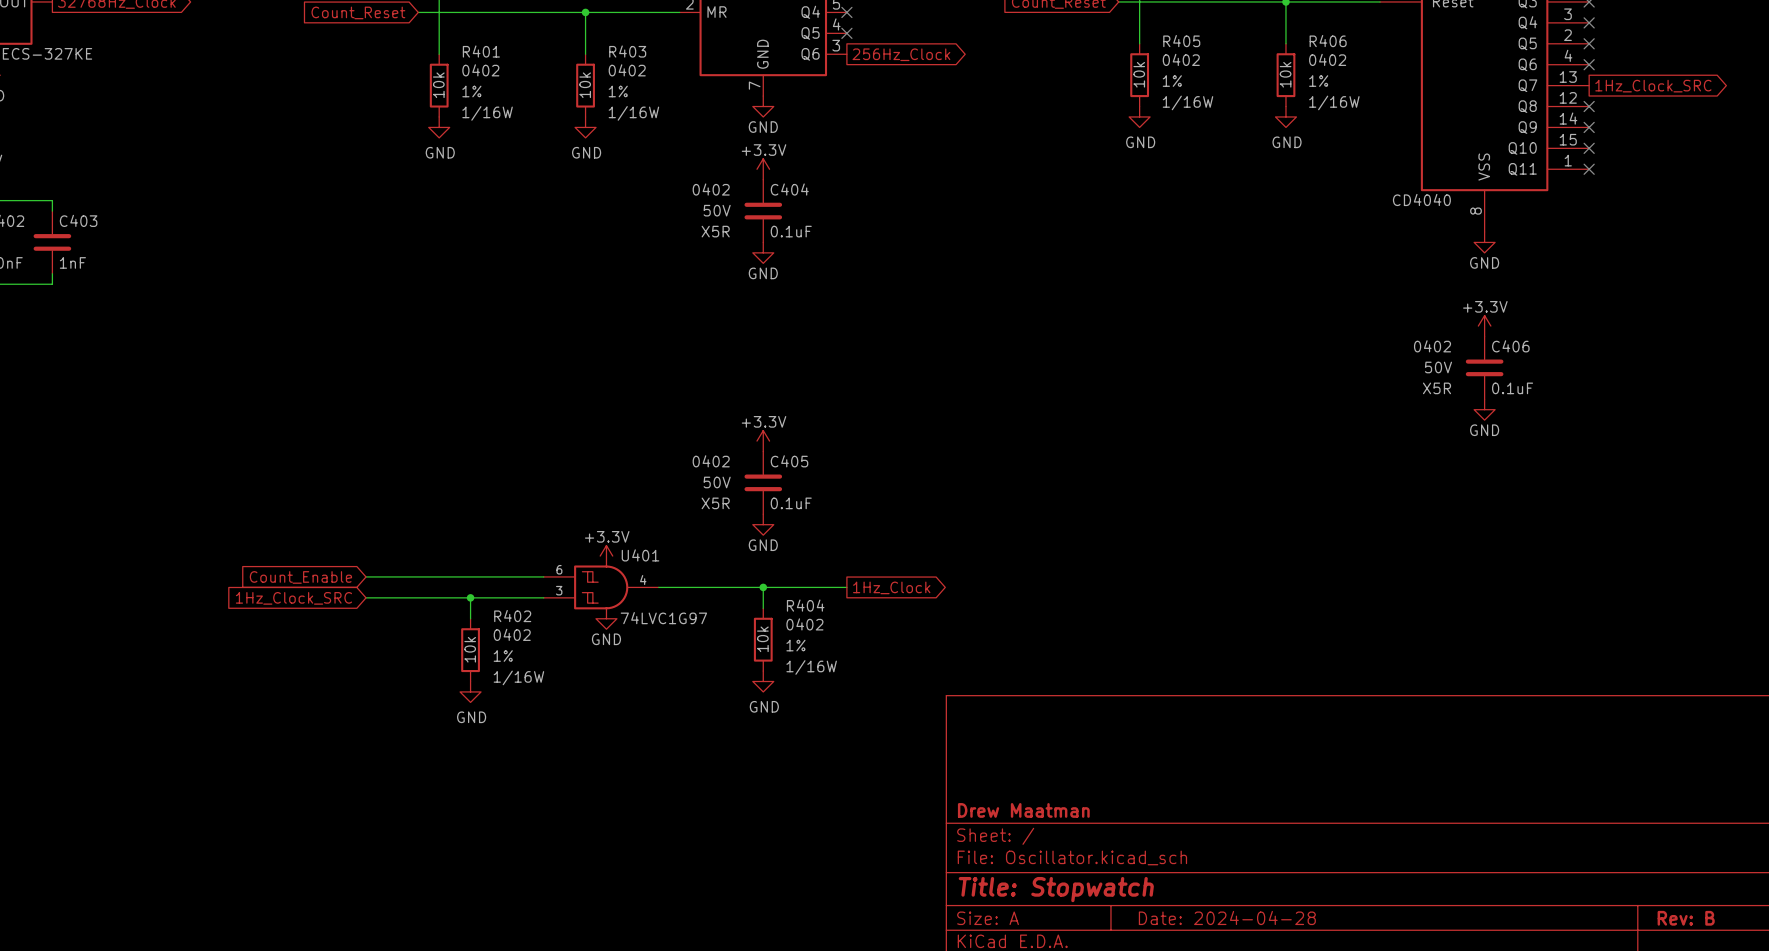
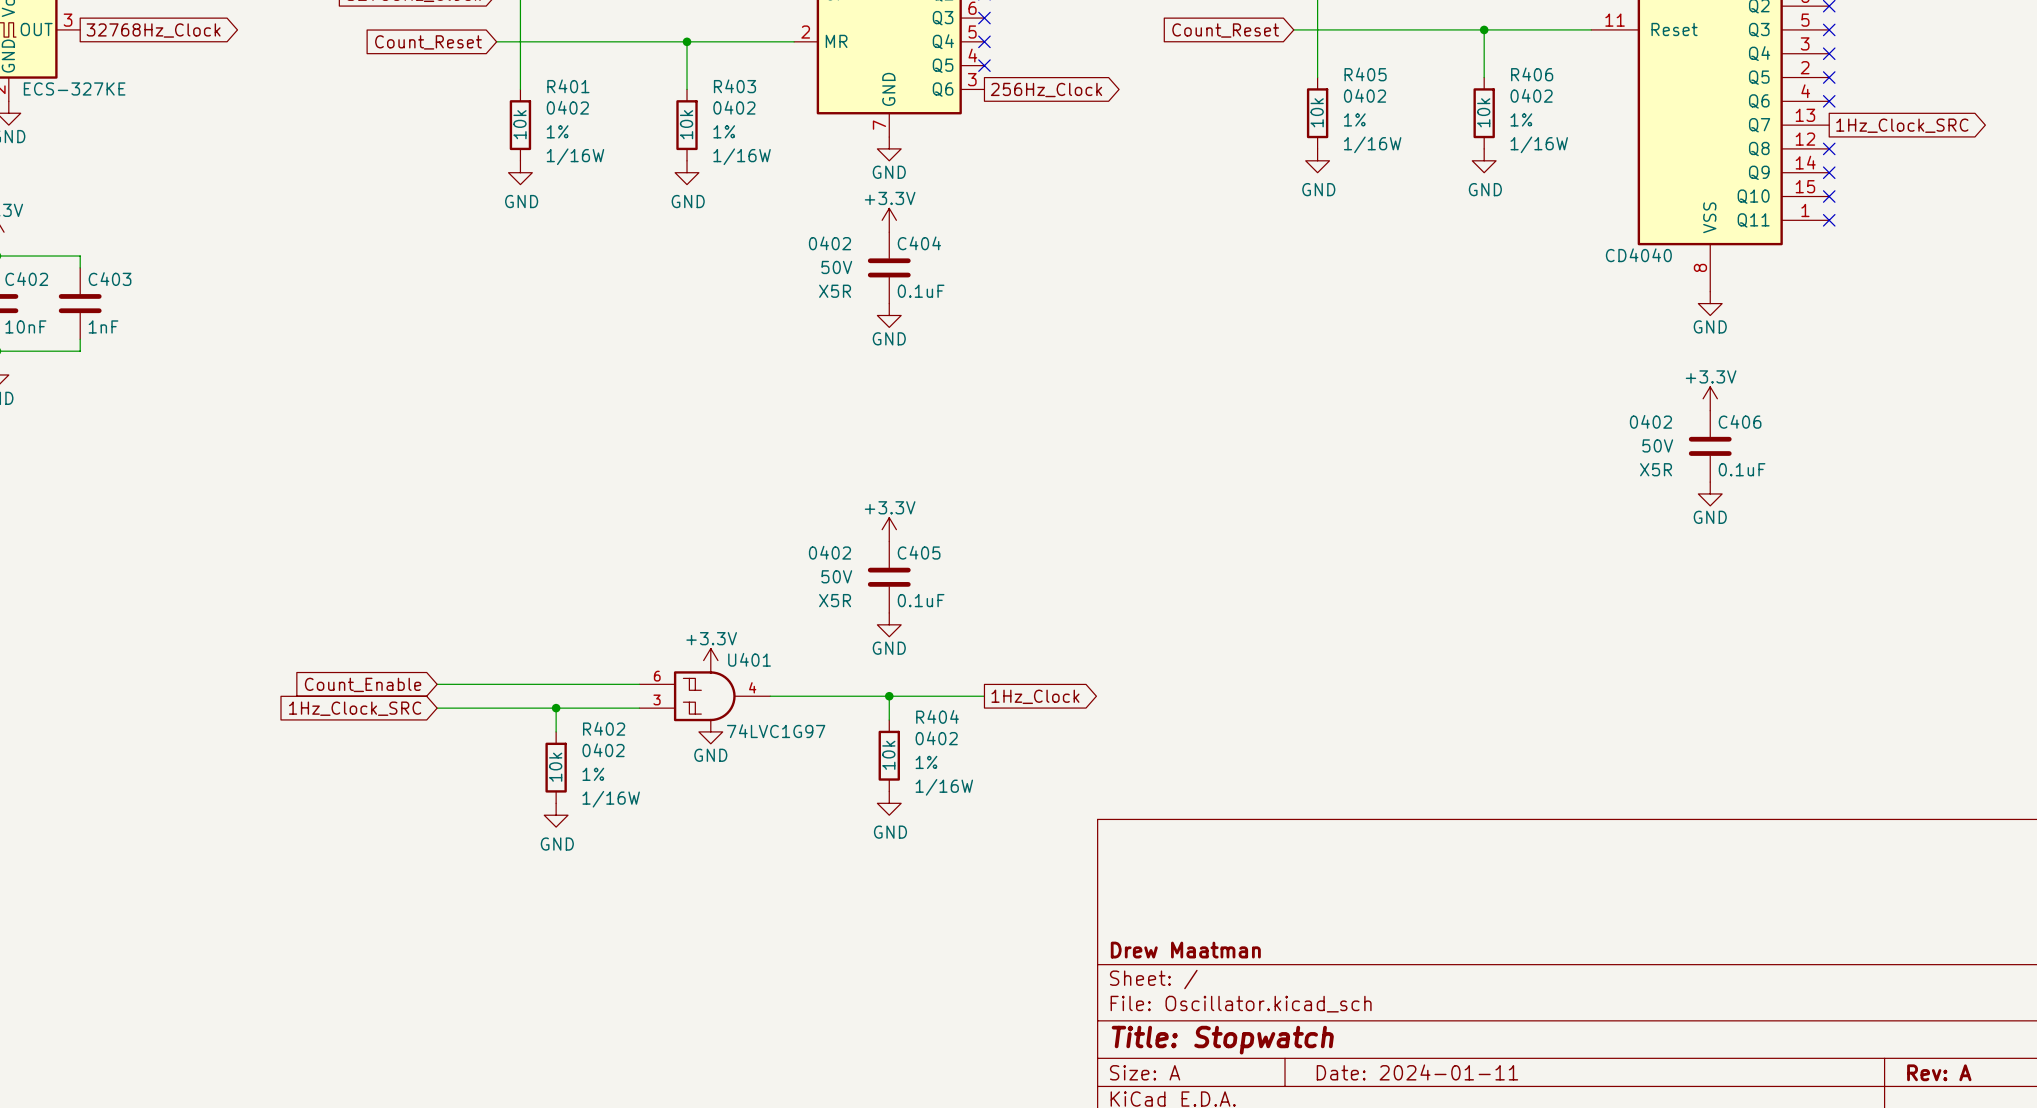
title block: Date: 2024-04-28 (1227, 917) -> Date: 2024-01-11 (1417, 1072)
title block: Rev: B (1686, 918) -> Rev: A (1939, 1072)

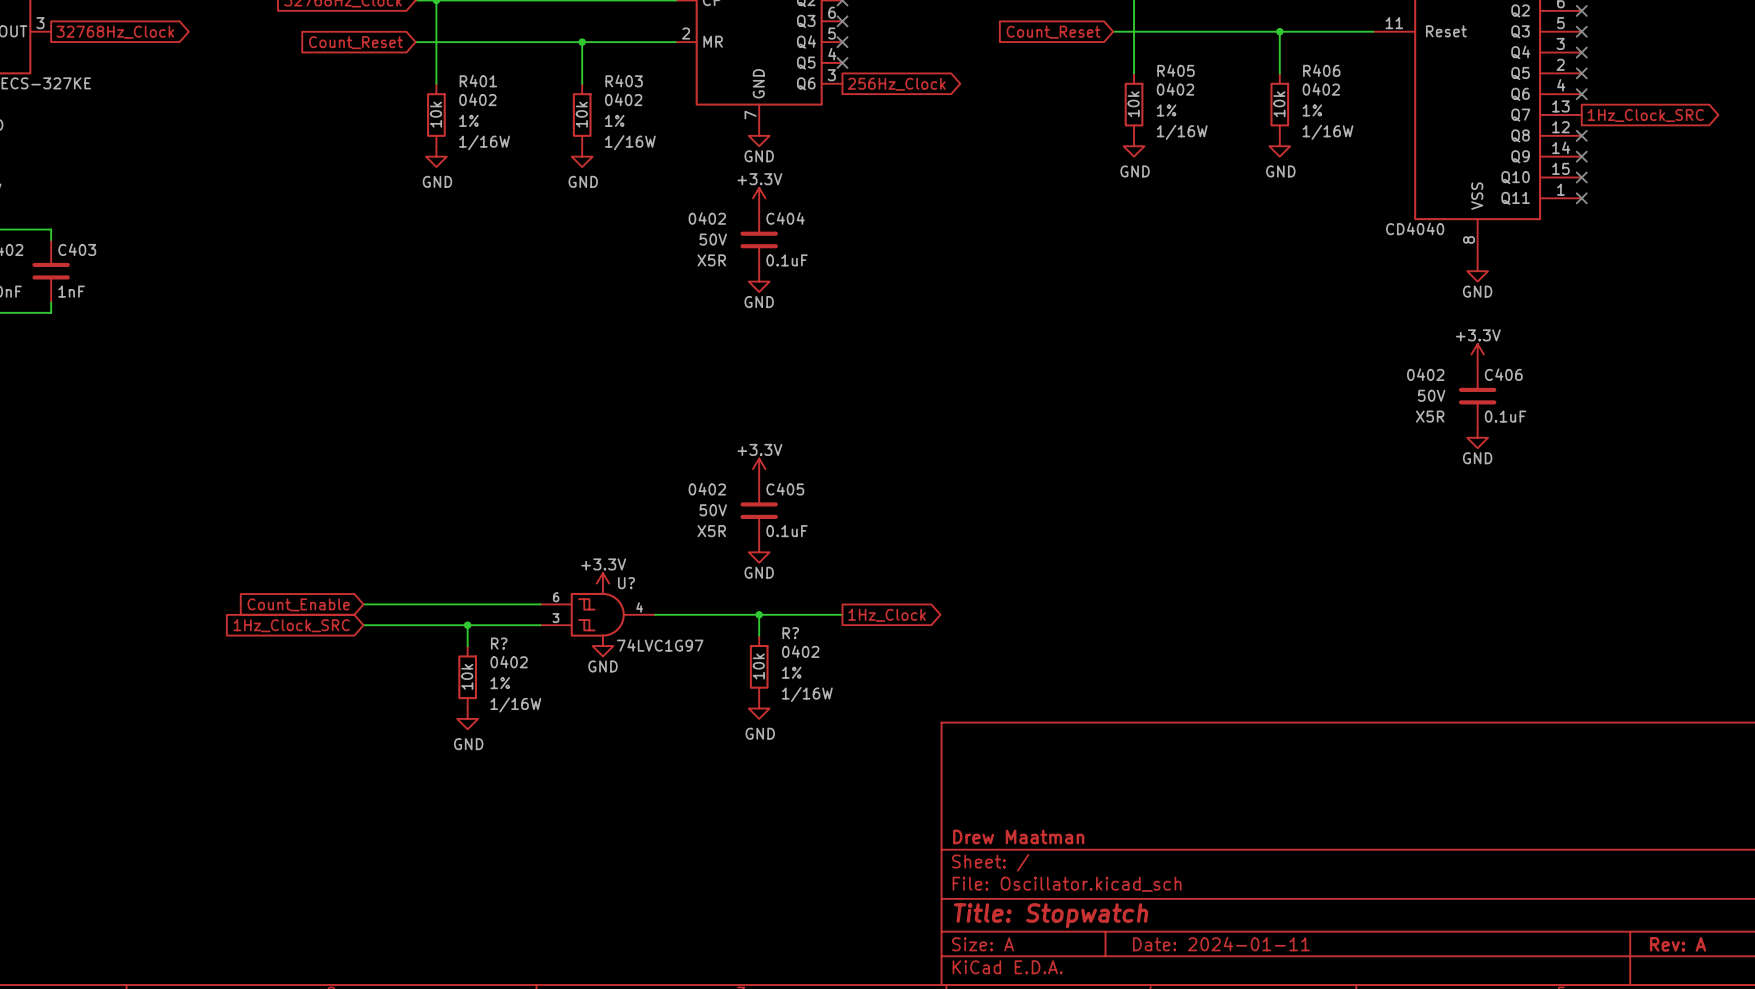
U401 name: U401 (749, 659) -> U? (626, 583)
R404 name: R404 (937, 716) -> R? (790, 633)
R402 name: R402 (604, 728) -> R? (499, 643)

